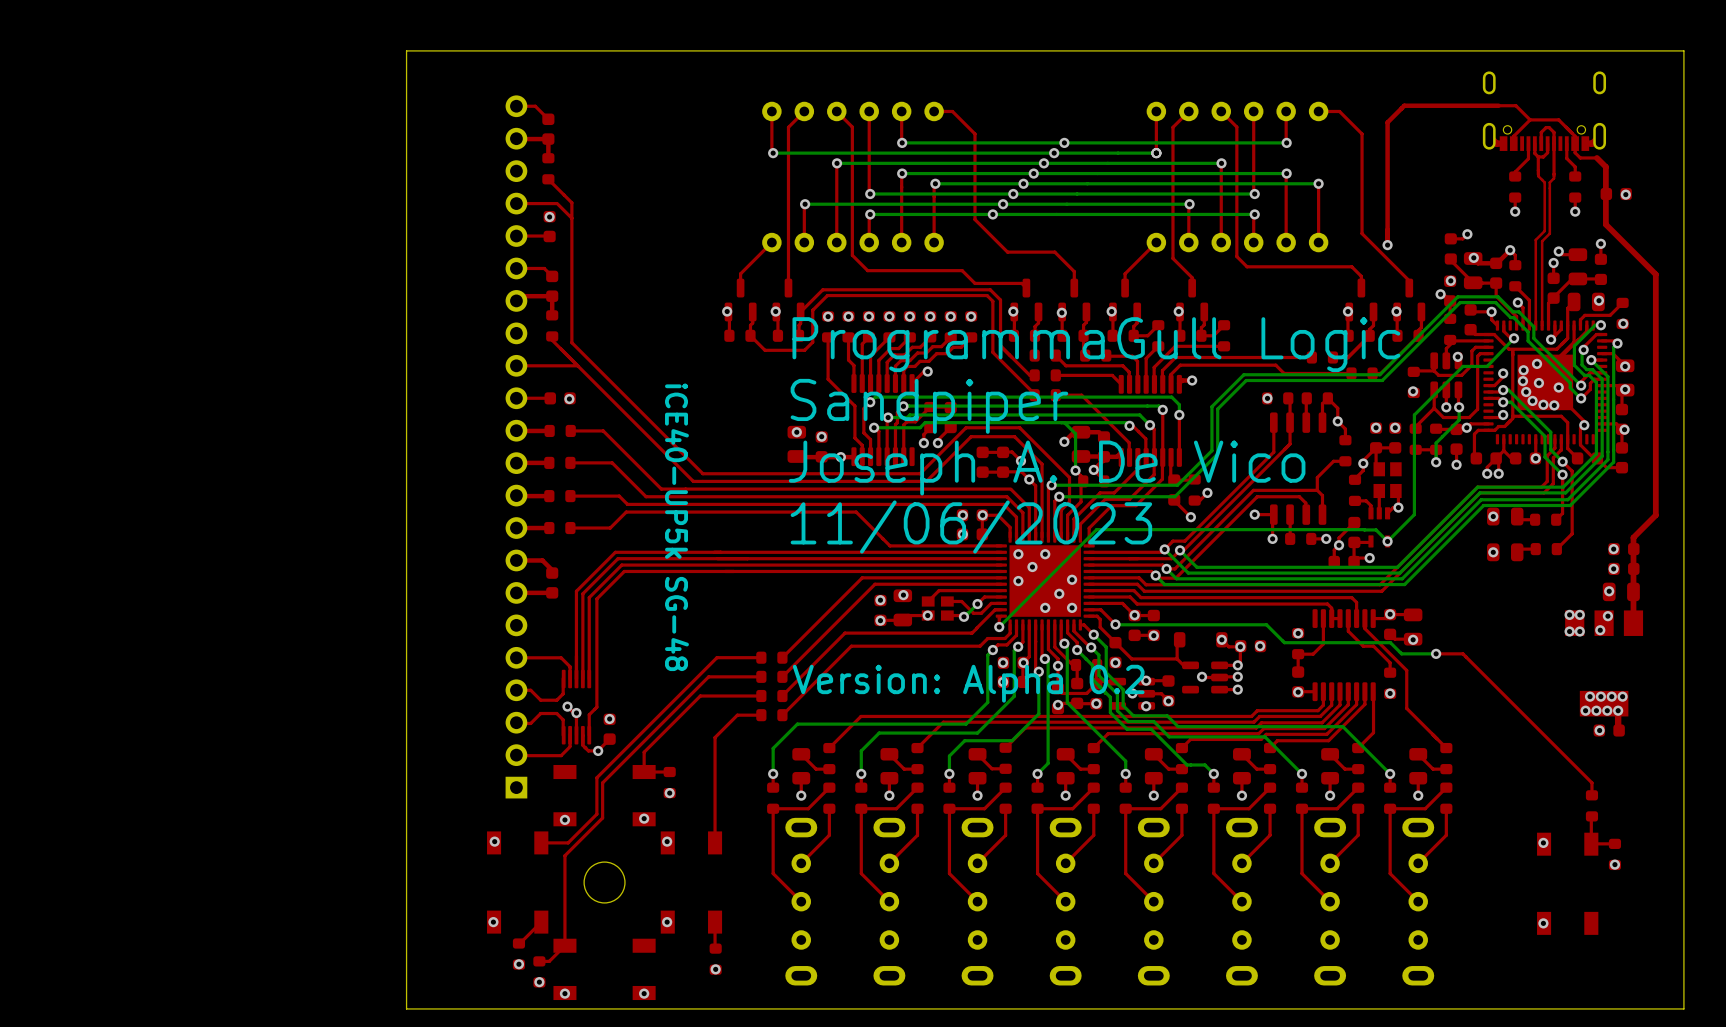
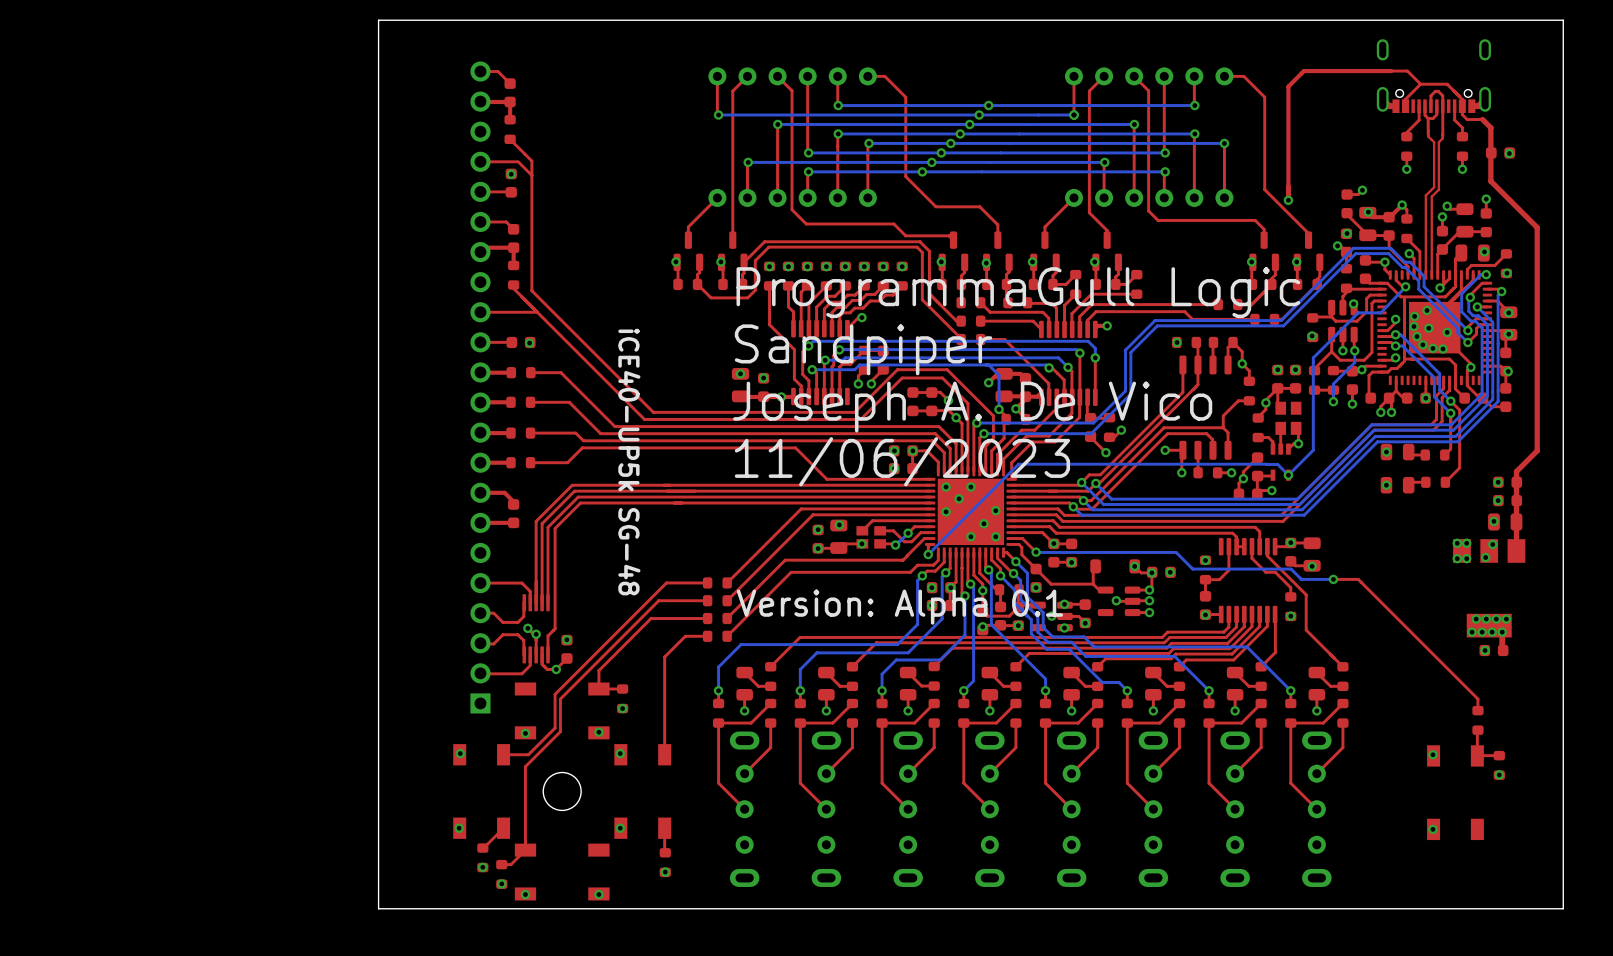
text: Version: Alpha 0.2 (968, 683) -> Version: Alpha 0.1 (899, 607)

